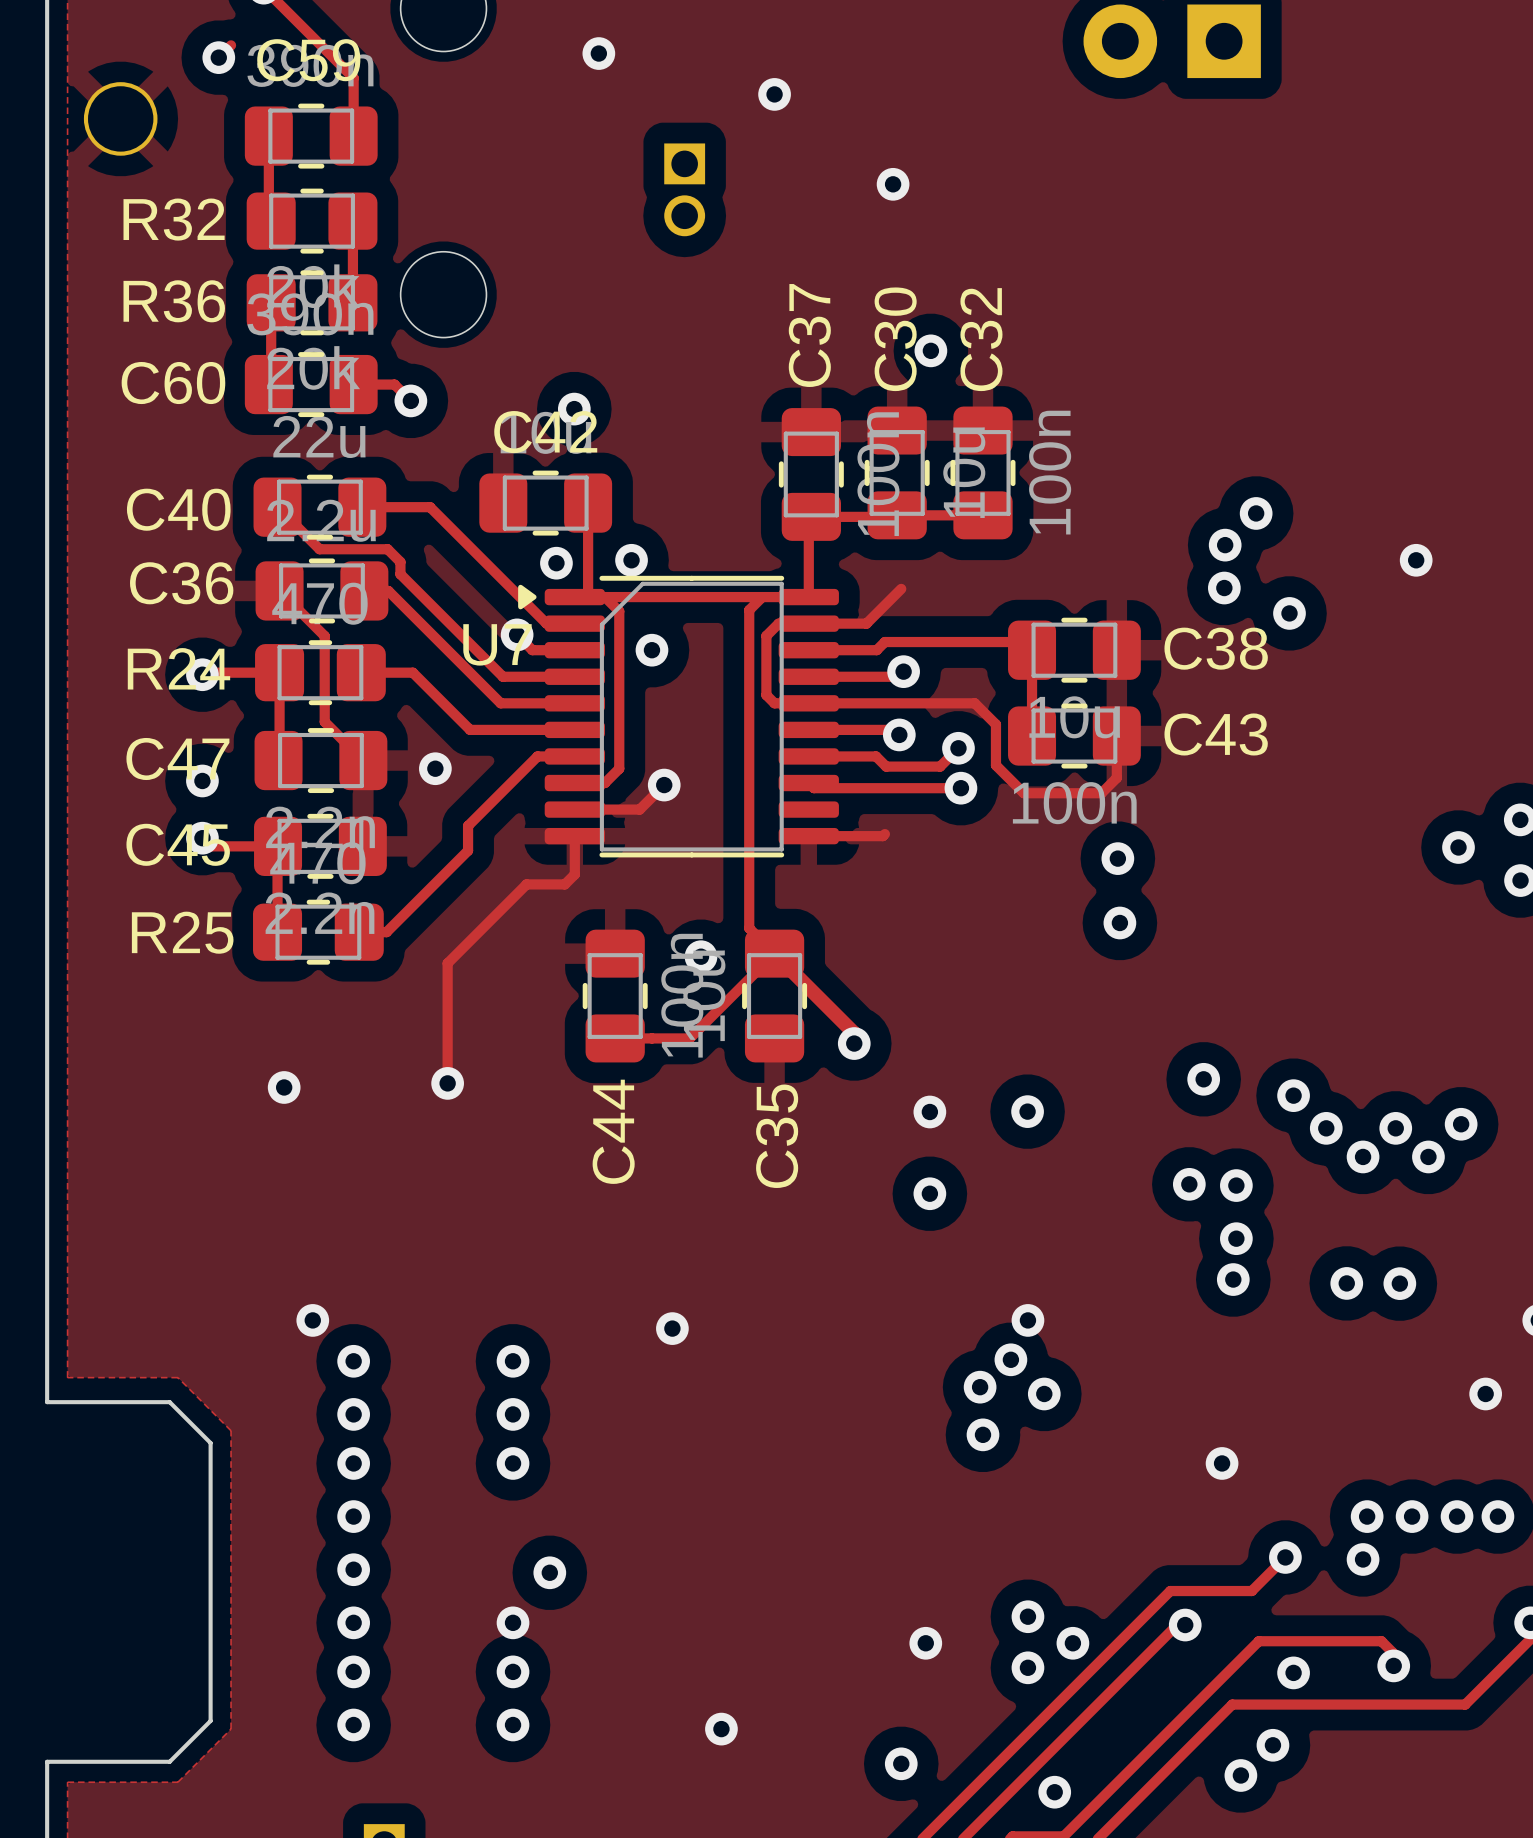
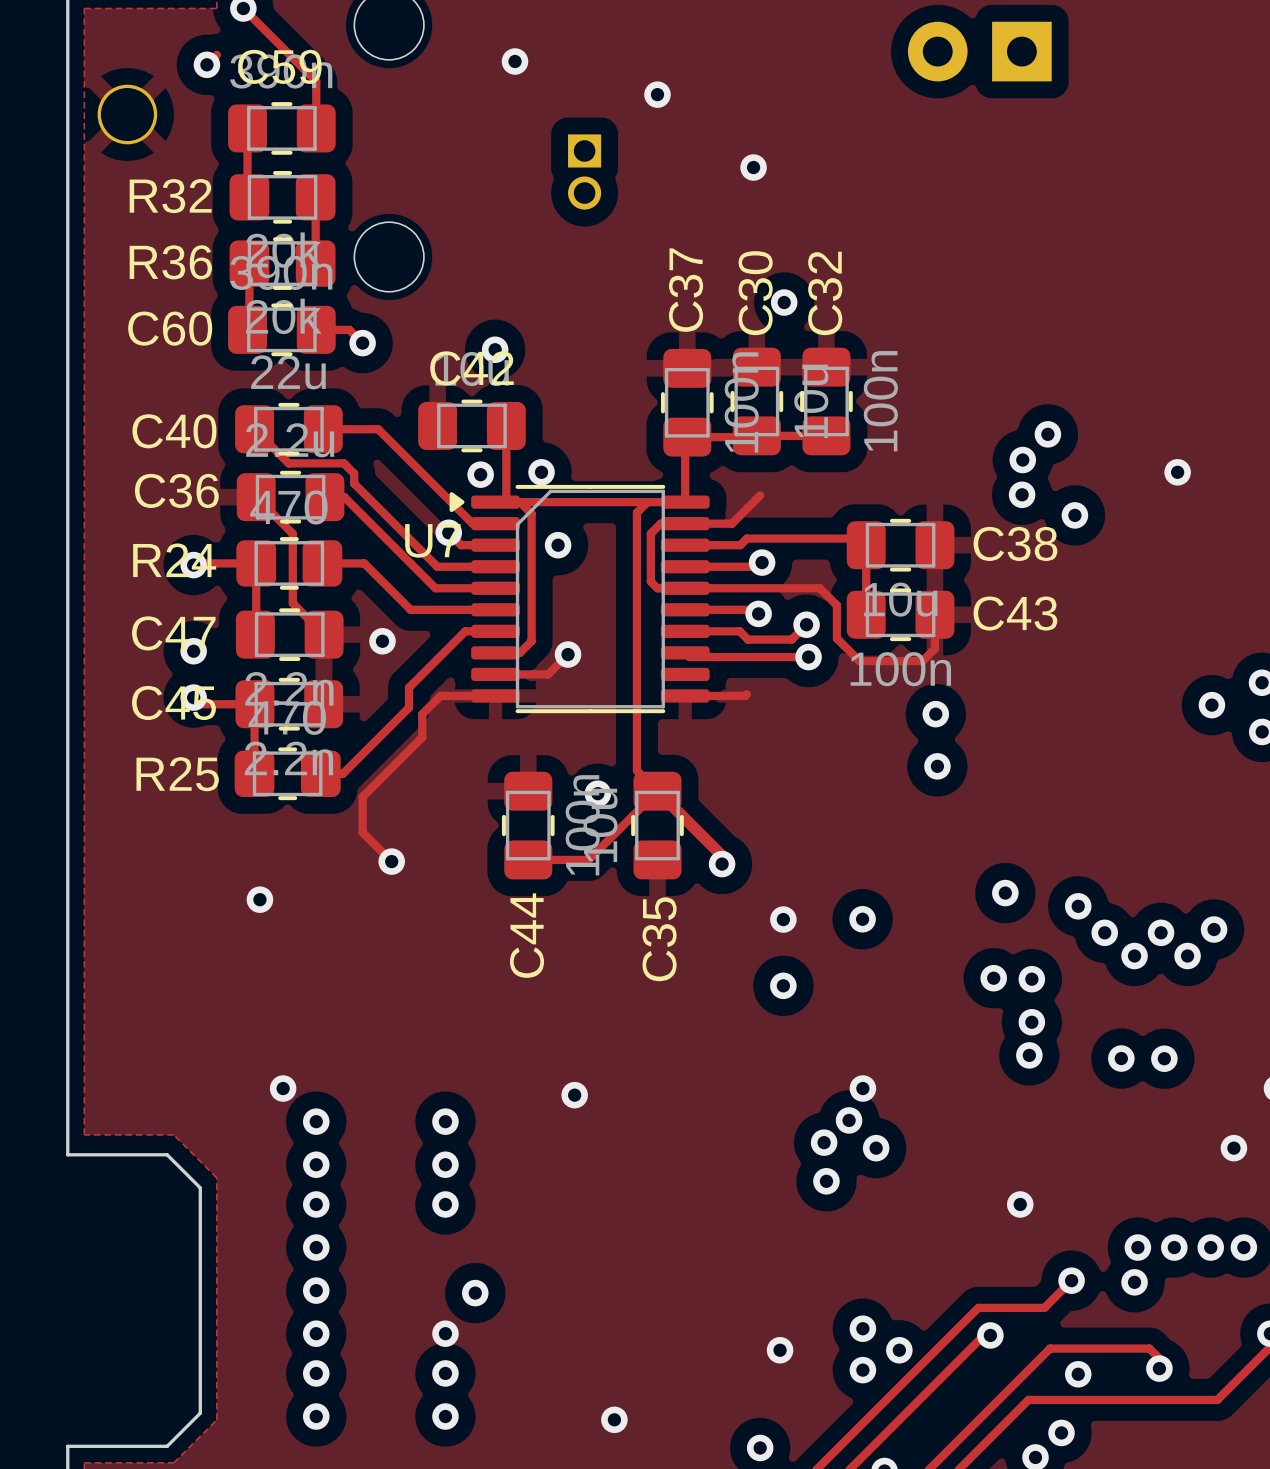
track: (574, 836) (574, 874) (564, 884) (526, 884) (447, 963) (447, 1083) -> (495, 695) (440, 695) (422, 714) (422, 737) (362, 796) (362, 832) (391, 861)
via position: (447, 1083) -> (391, 861)

